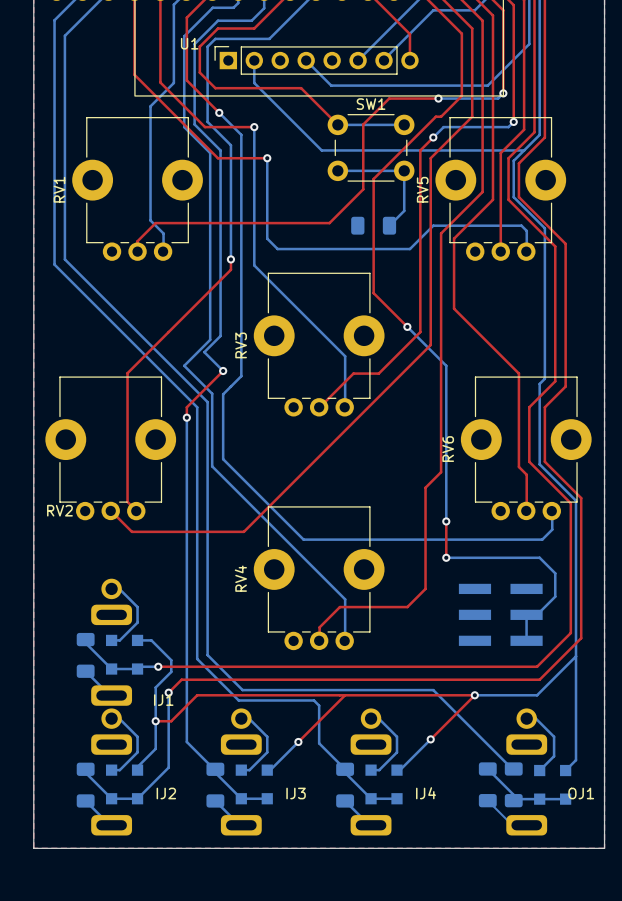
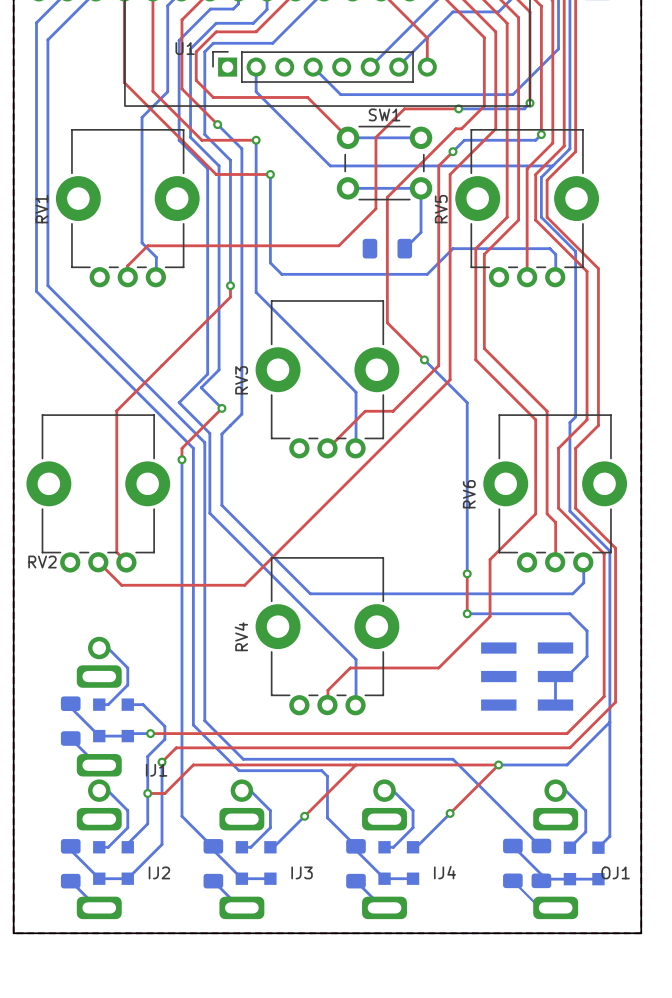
top track: (482, 191) (441, 233) (441, 472) (425, 487) (425, 588) (407, 607) -> (475, 339) (475, 359) (535, 419) (535, 513) (490, 559) (490, 616) (438, 667) (424, 667)
top track: (461, 230) (454, 238) -> (507, 211) (507, 217) (475, 248) (475, 262)
top track: (454, 308) (461, 316) -> (484, 254) (484, 348)

